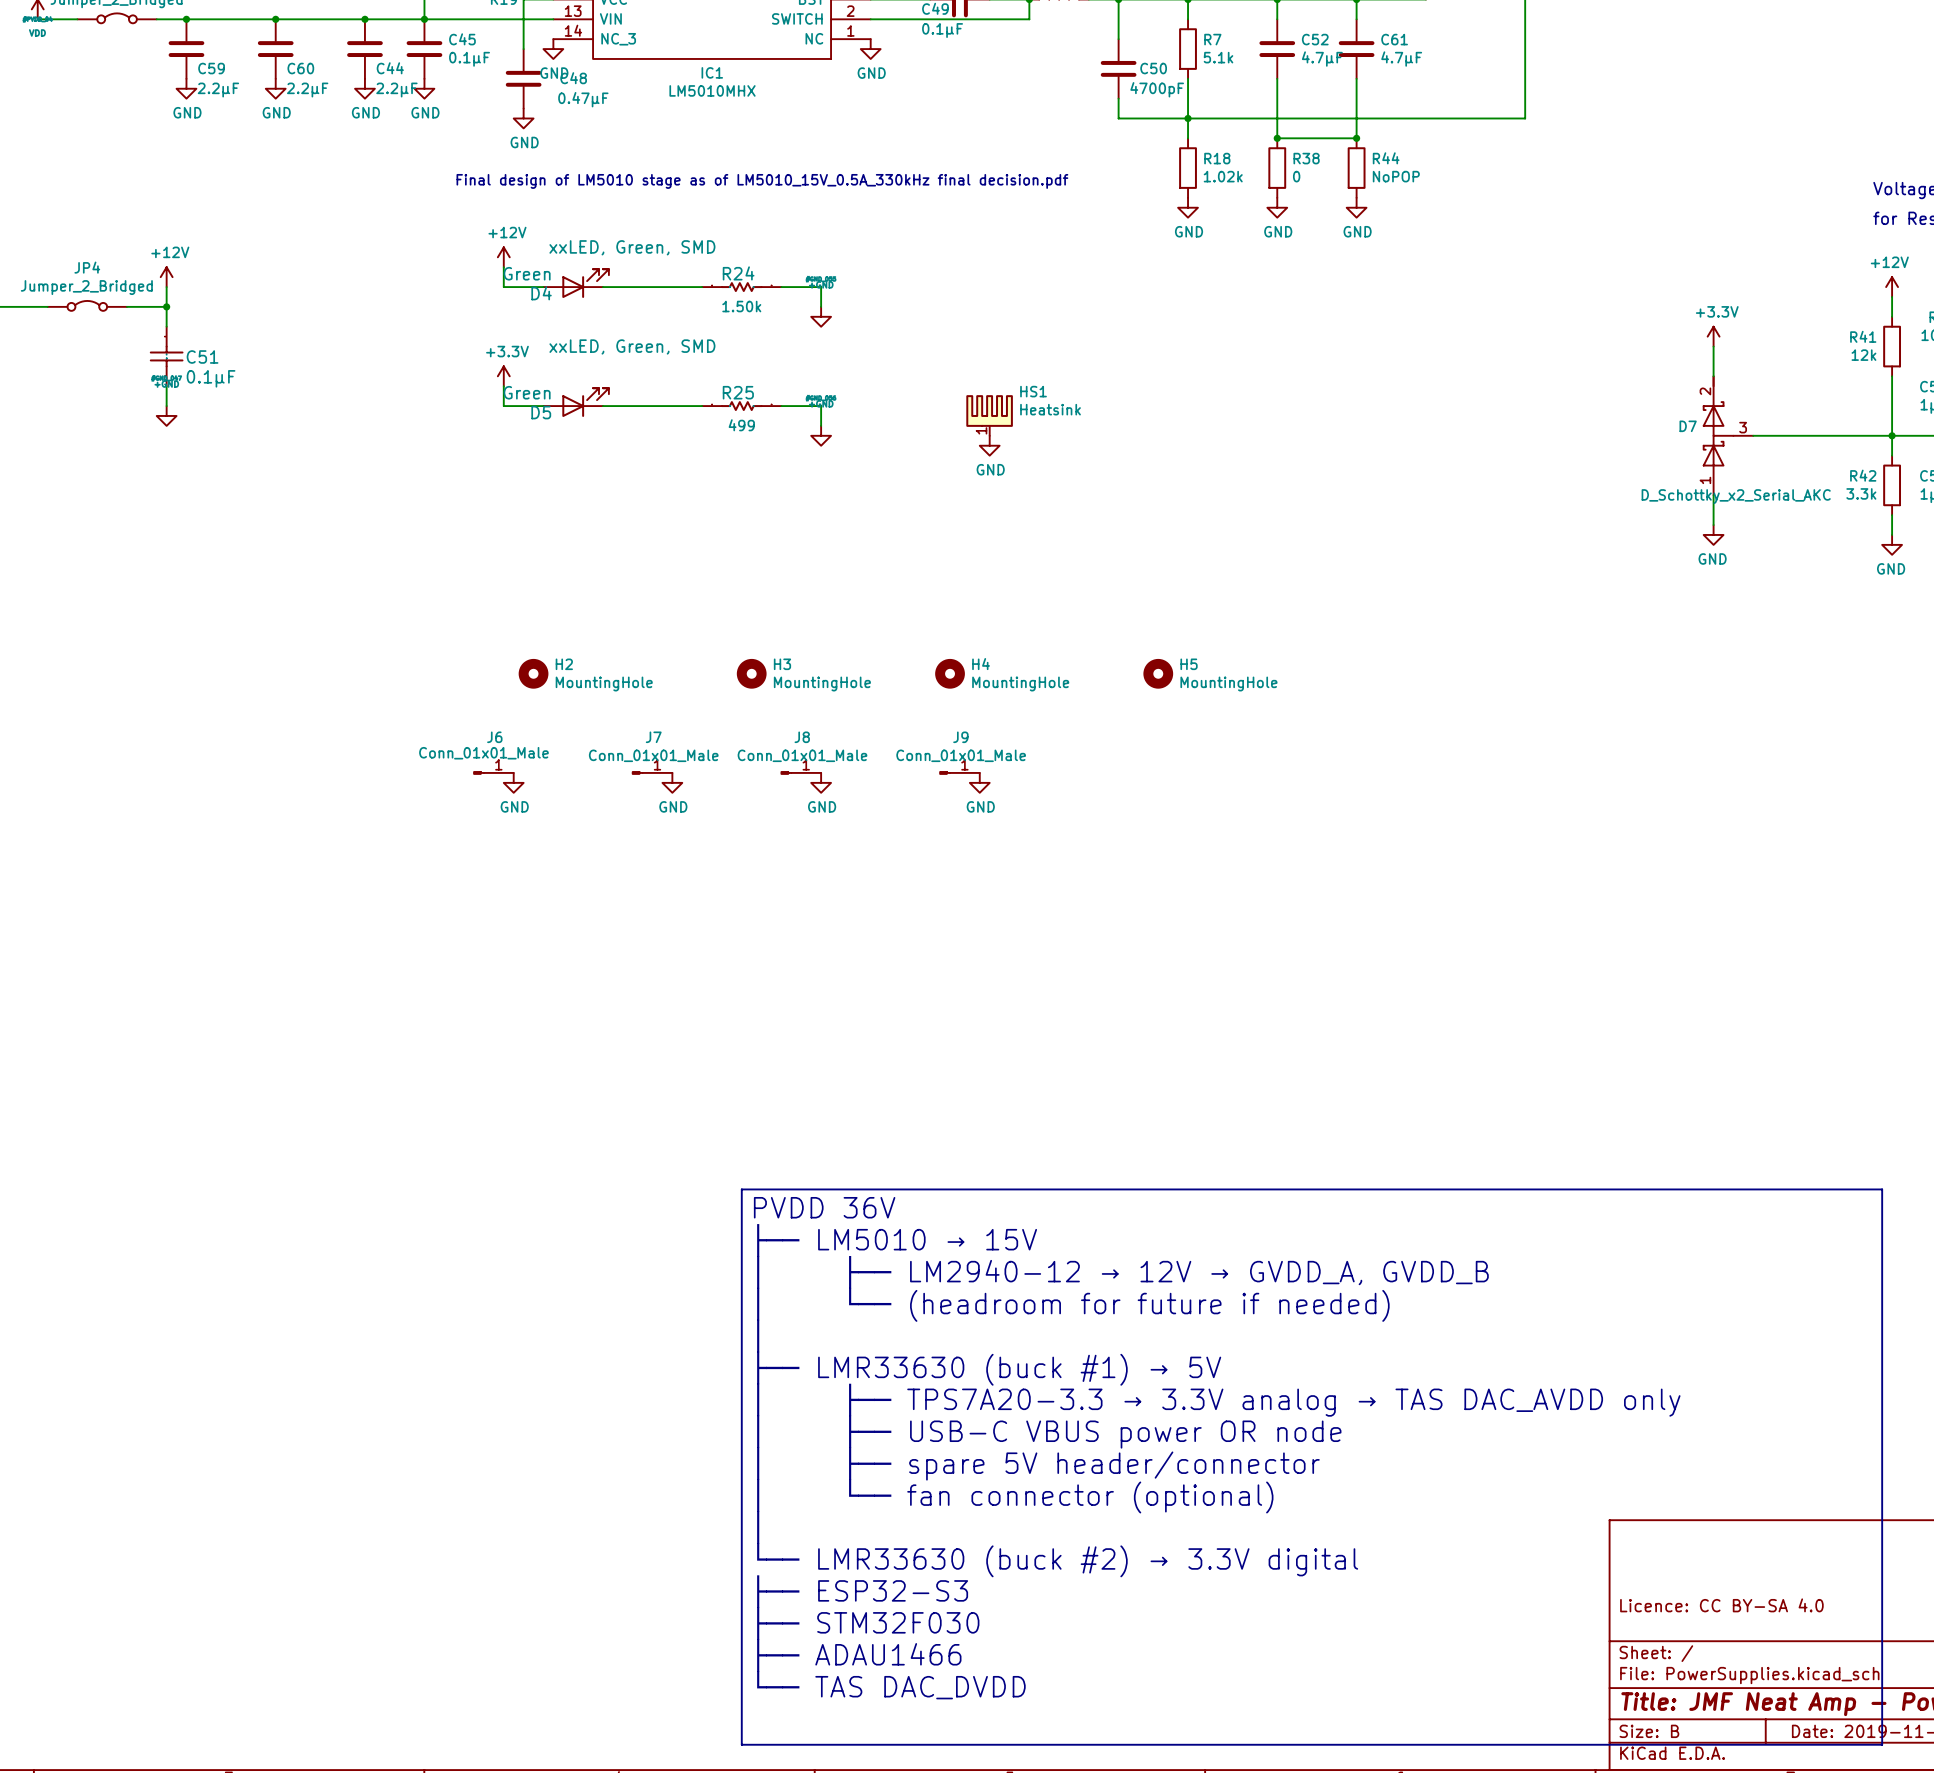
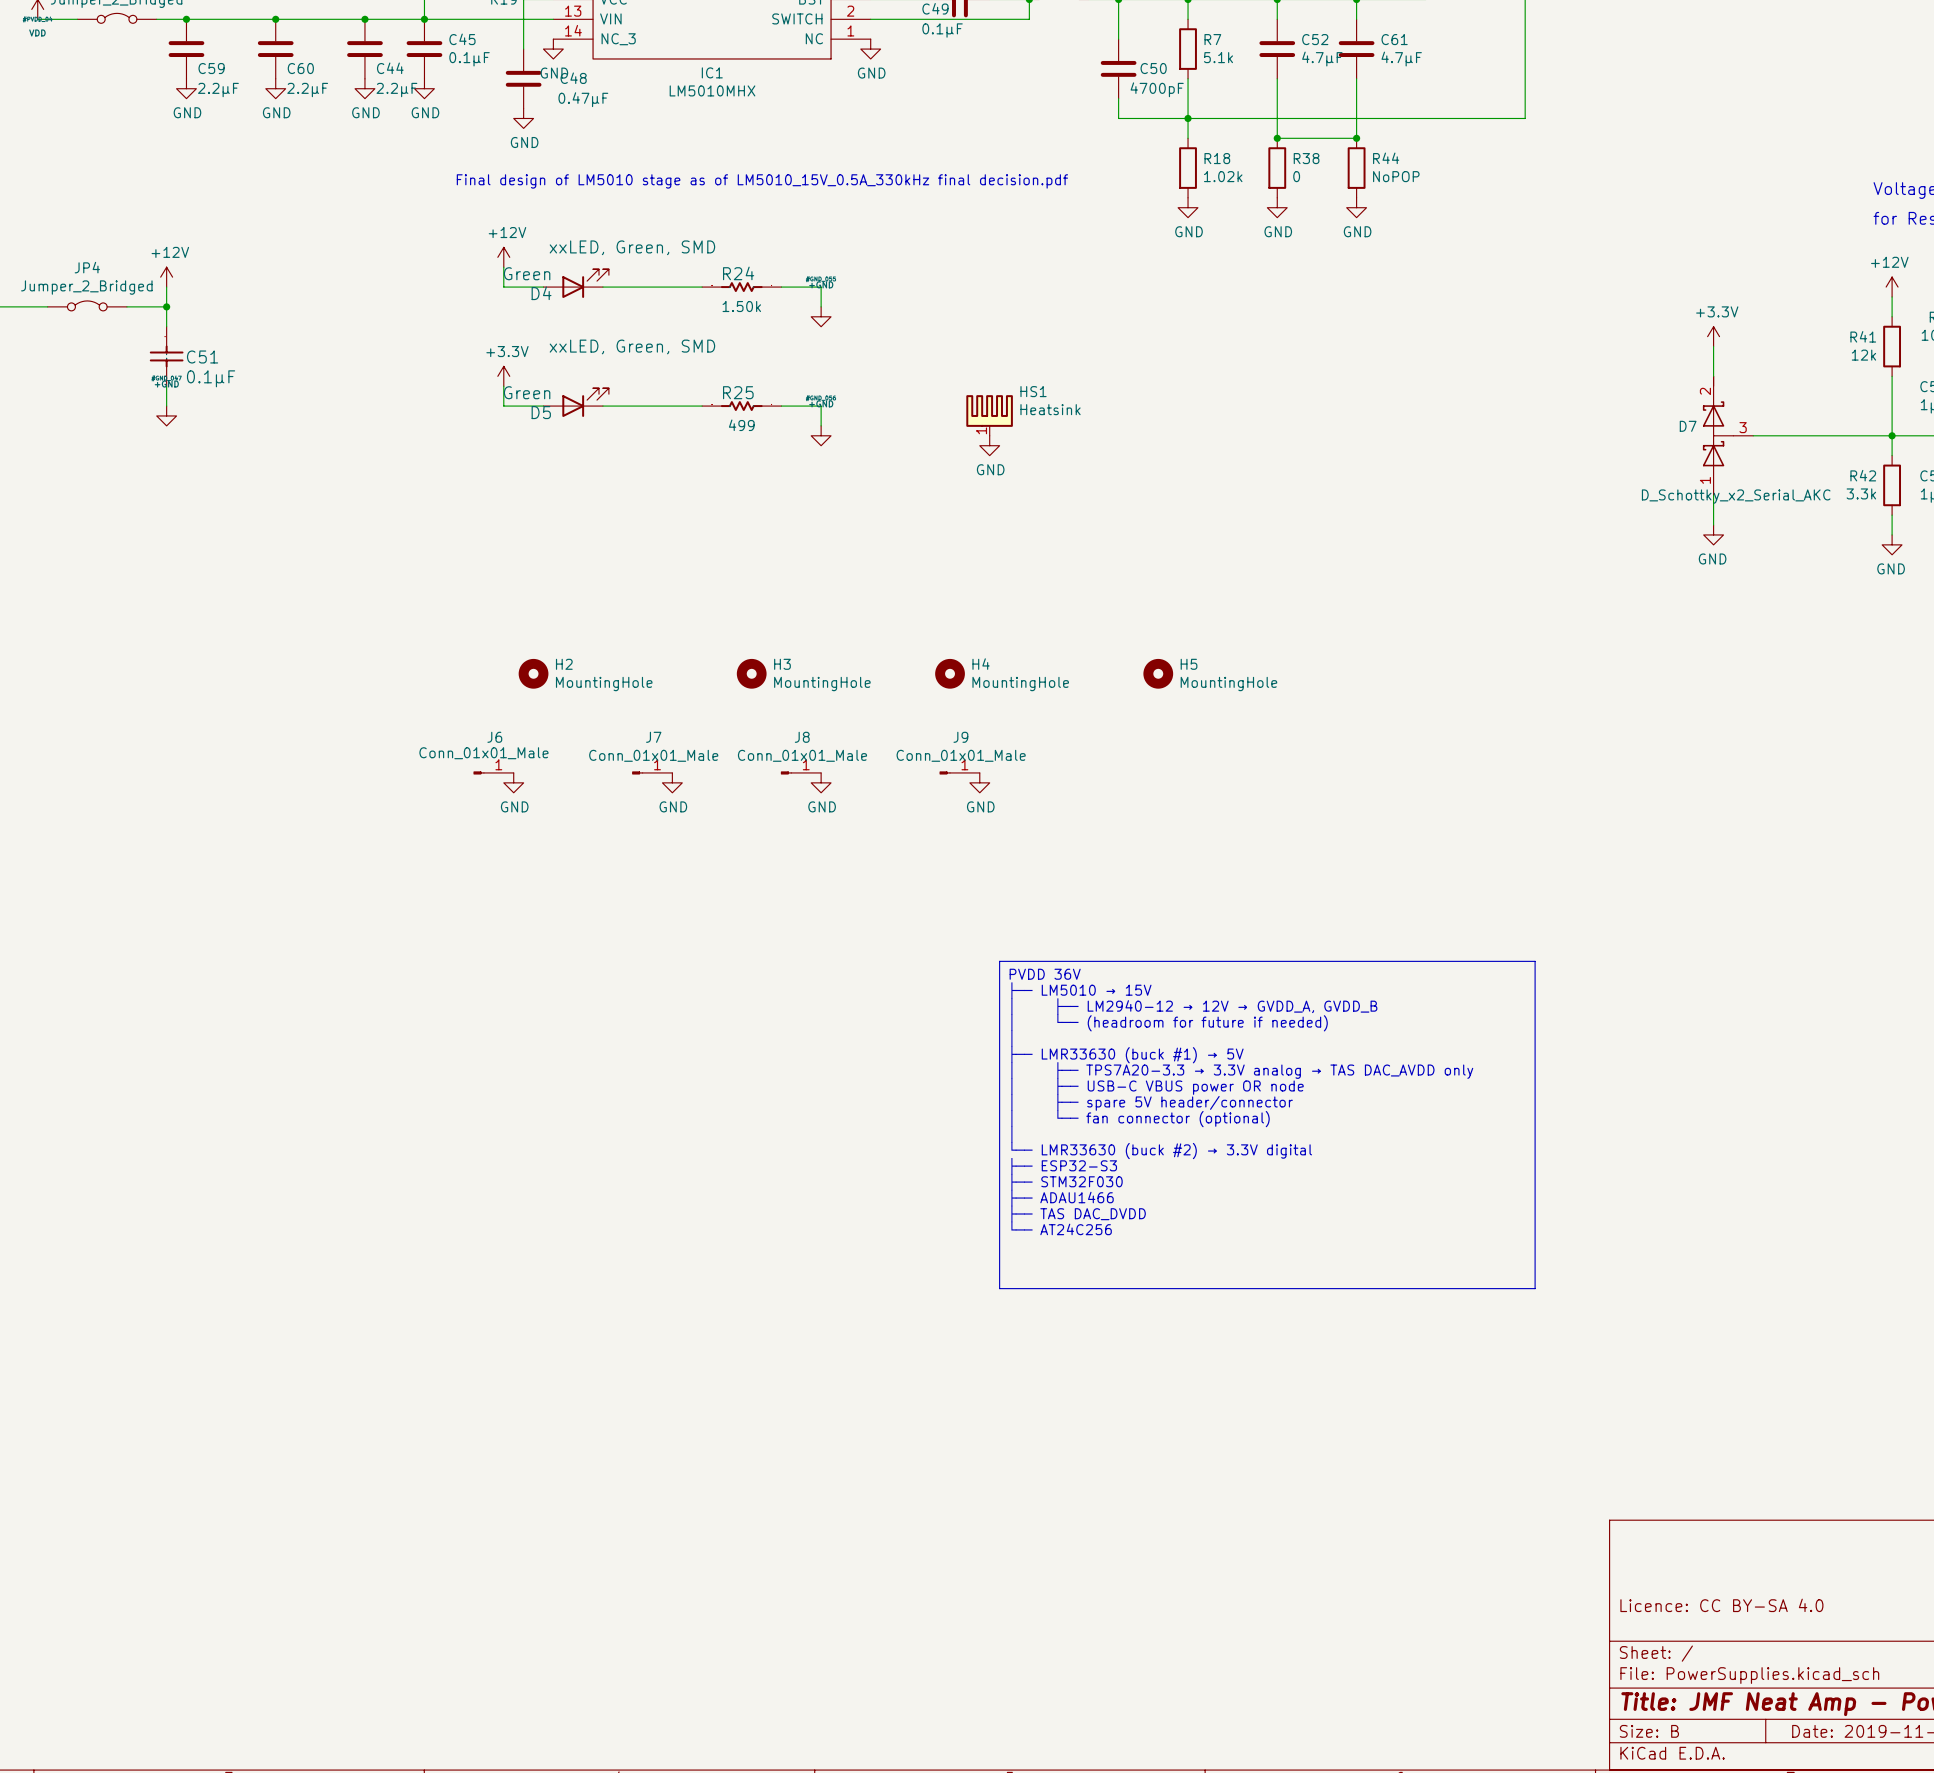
line: none -> (999, 961) (1535, 961) (1535, 1288) (999, 1288) (999, 961)
text: none -> PVDD 36V (1045, 974)
text: none -> ├── LM5010 → 15V (1081, 990)
text: none -> │ ├── LM2940-12 → 12V → GVDD_A, GVDD_B (1194, 1006)
text: none -> │ └── (headroom for future if needed) (1169, 1022)
text: none -> │ (1011, 1038)
text: none -> ├── LMR33630 (buck #1) → 5V (1127, 1054)
text: none -> │ ├── TPS7A20-3.3 → 3.3V analog → TAS DAC_AVDD only (1242, 1070)
text: none -> │ ├── USB-C VBUS power OR node (1157, 1086)
text: none -> │ ├── spare 5V header/connector (1151, 1102)
text: none -> │ └── fan connector (optional) (1140, 1118)
text: none -> │ (1011, 1134)
text: none -> └── LMR33630 (buck #2) → 3.3V digital (1161, 1150)
text: none -> ├── ESP32-S3 (1063, 1166)
text: none -> ├── STM32F030 (1066, 1182)
line: (741, 1189) (1882, 1189) (1882, 1744) (741, 1744) (741, 1189) -> none
text: none -> ├── ADAU1466 (1062, 1198)
text: PVDD 36V (824, 1207) -> none
text: none -> ├── TAS DAC_DVDD (1078, 1213)
text: none -> └── AT24C256 (1061, 1228)
text: ├── LM5010 → 15V (896, 1240) -> none
text: │ ├── LM2940-12 → 12V → GVDD_A, GVDD_B (1122, 1272) -> none
text: │ └── (headroom for future if needed) (1072, 1304) -> none
text: │ (758, 1336) -> none
text: ├── LMR33630 (buck #1) → 5V (988, 1368) -> none
text: │ ├── TPS7A20-3.3 → 3.3V analog → TAS DAC_AVDD only (1218, 1399) -> none
text: │ ├── USB-C VBUS power OR node (1048, 1431) -> none
text: │ ├── spare 5V header/connector (1038, 1463) -> none
text: │ └── fan connector (optional) (1014, 1496) -> none
text: │ (758, 1527) -> none
text: └── LMR33630 (buck #2) → 3.3V digital (1057, 1559) -> none
text: ├── ESP32-S3 (862, 1591) -> none
text: ├── STM32F030 (867, 1623) -> none
text: ├── ADAU1466 (858, 1655) -> none
text: └── TAS DAC_DVDD (890, 1684) -> none

